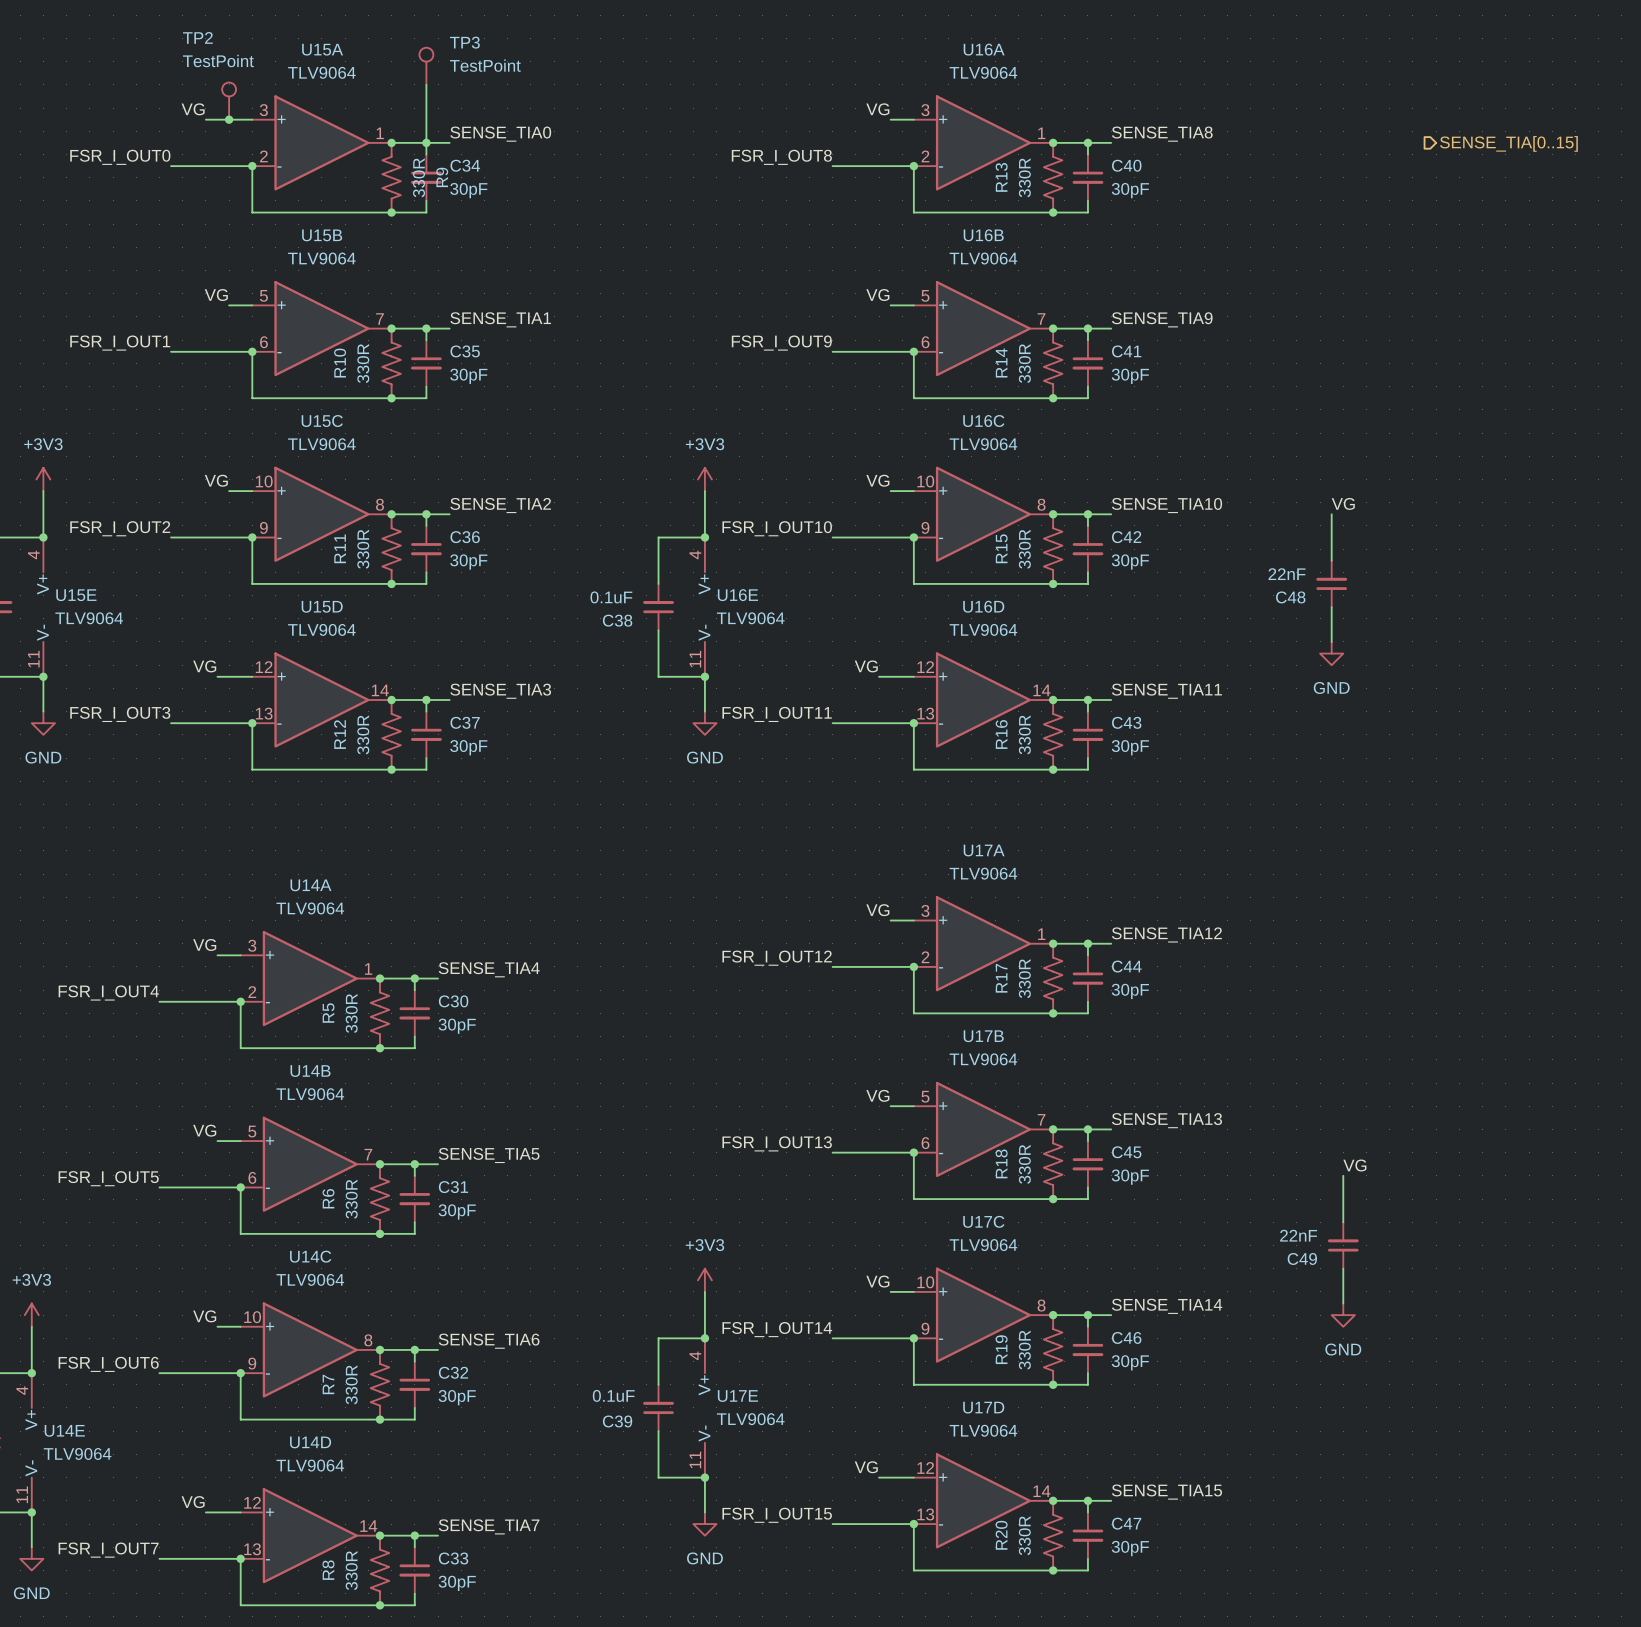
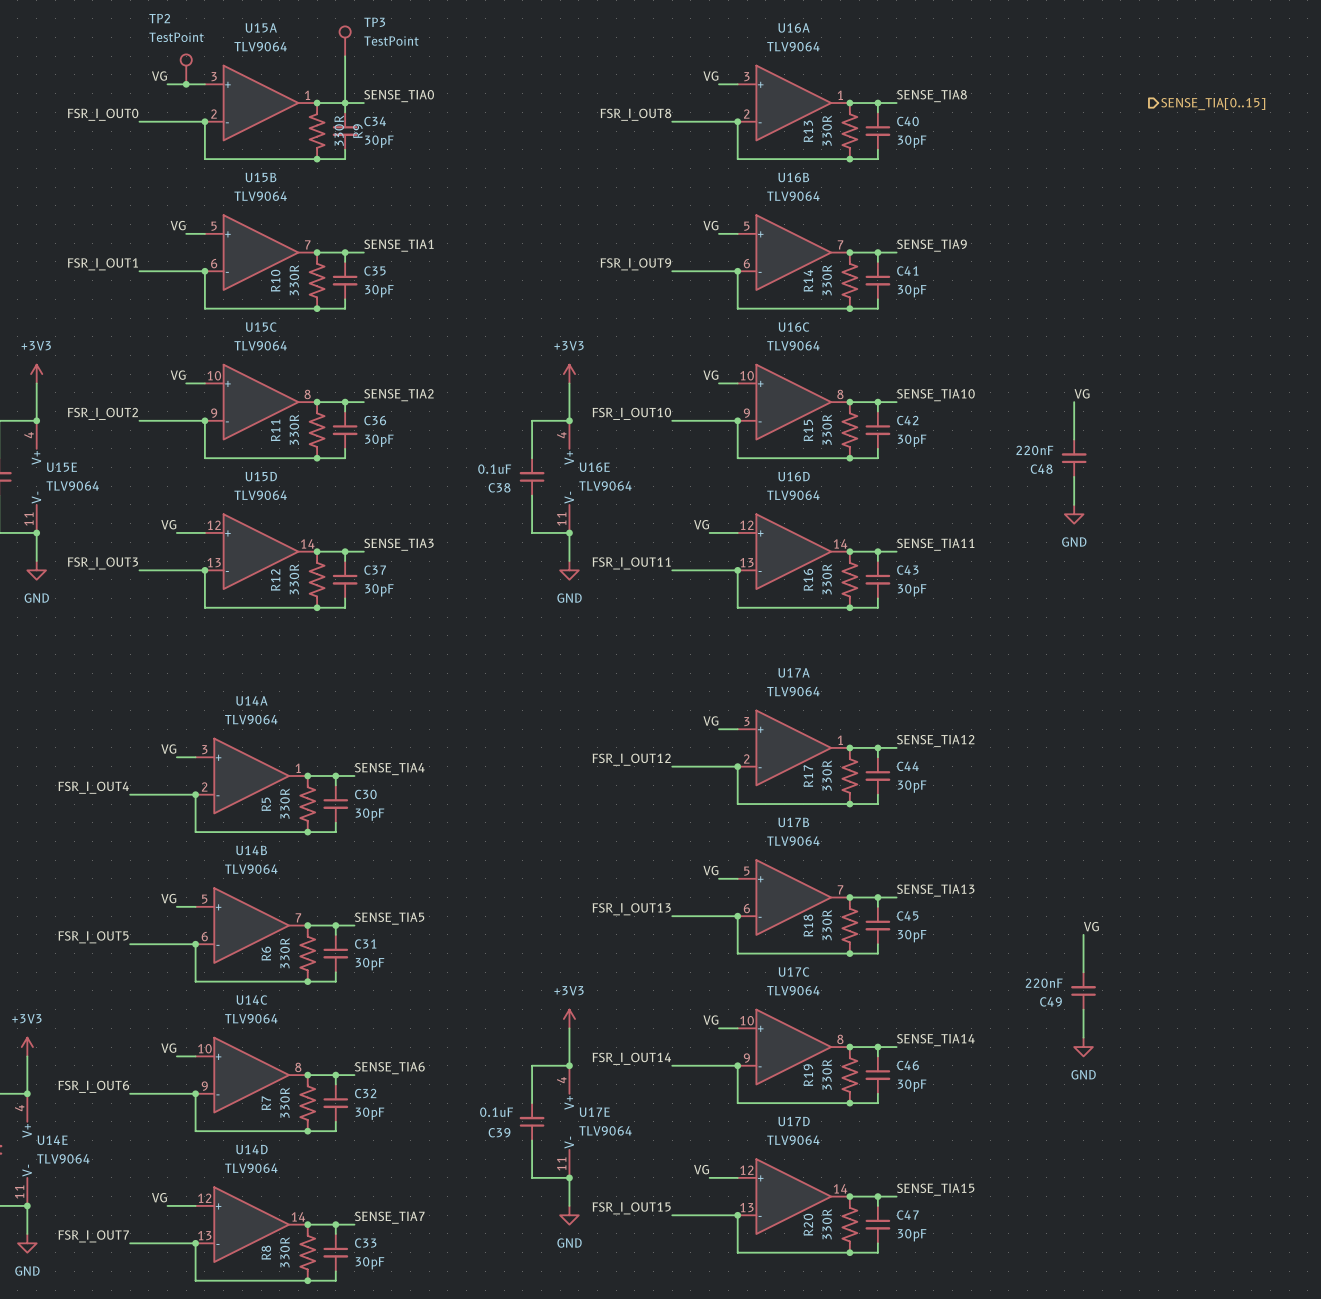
C48 value: 22nF (1287, 574) -> 220nF (1034, 450)
C49 value: 22nF (1298, 1235) -> 220nF (1044, 983)

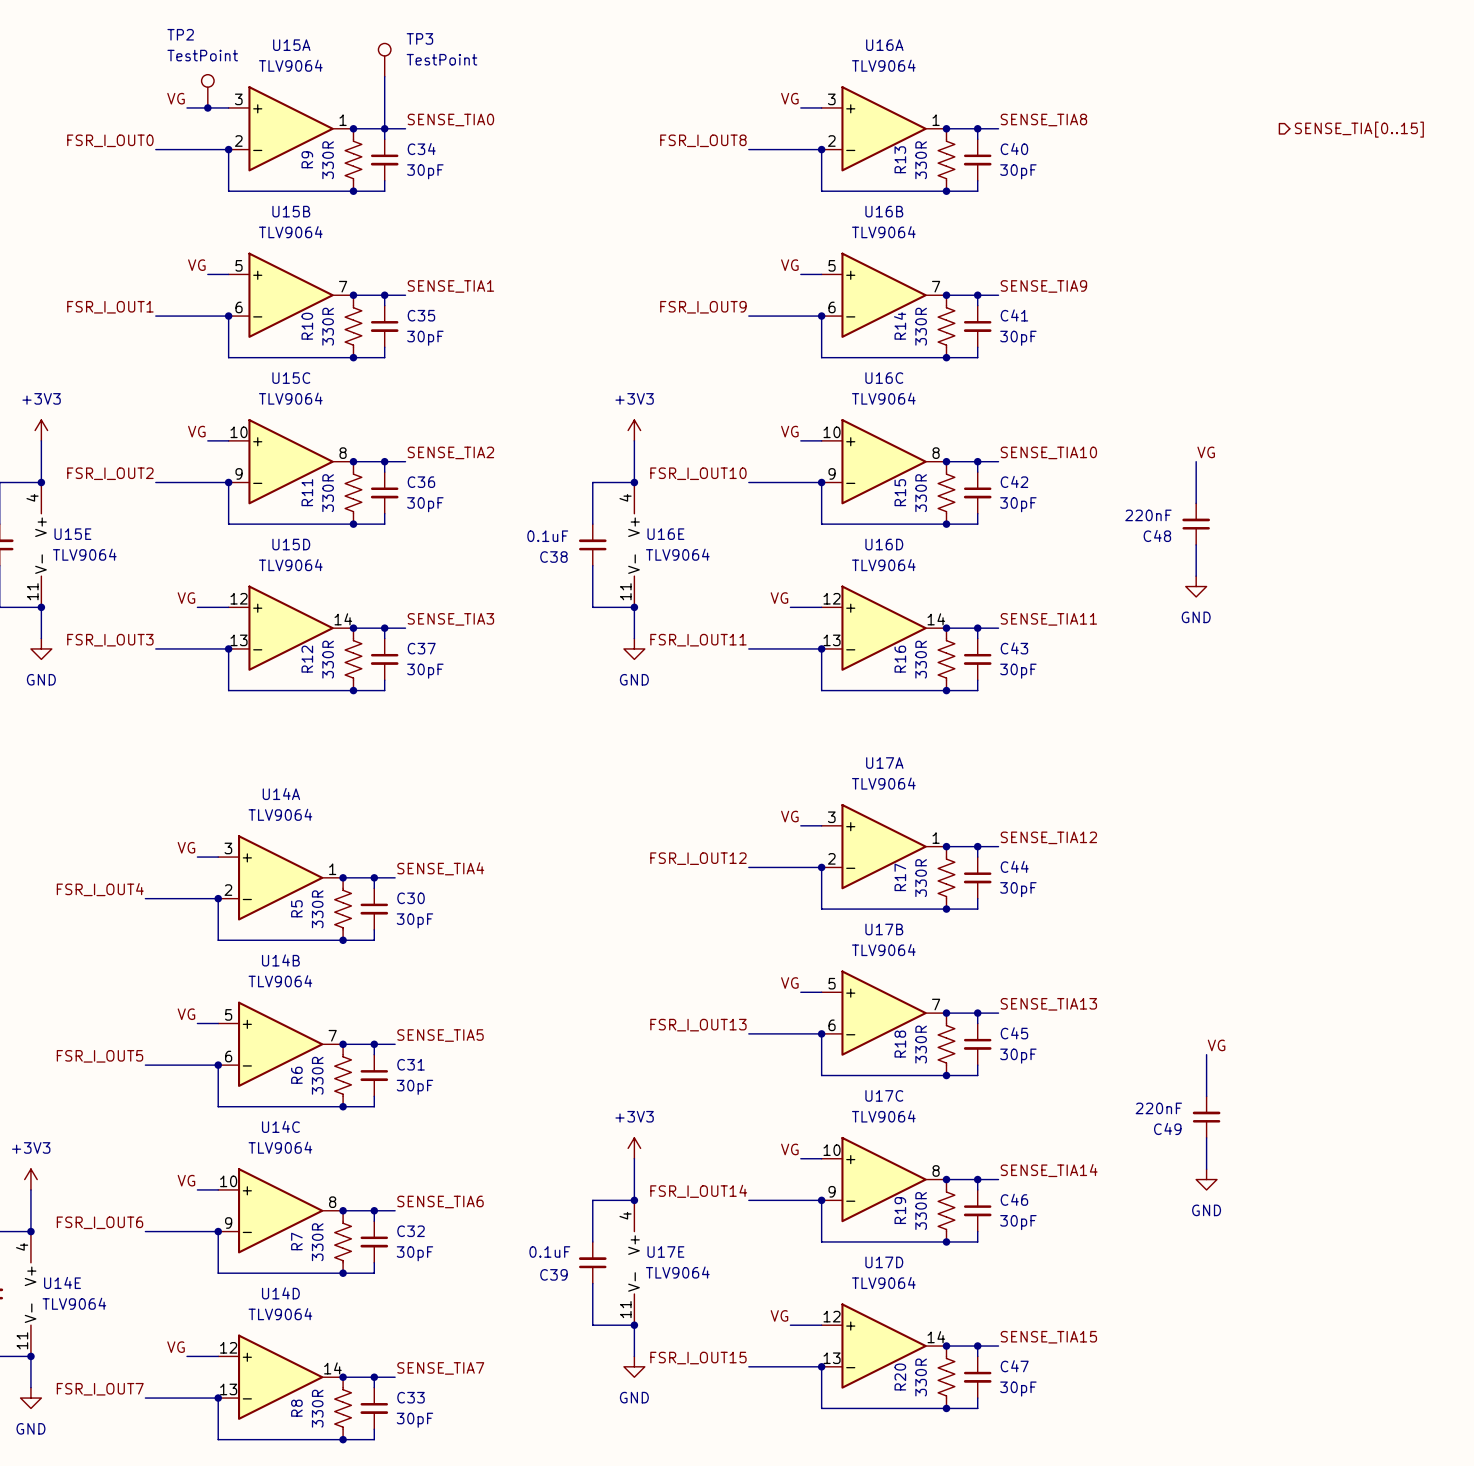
R9 flip: as is (317, 131) -> left-right (353, 159)

